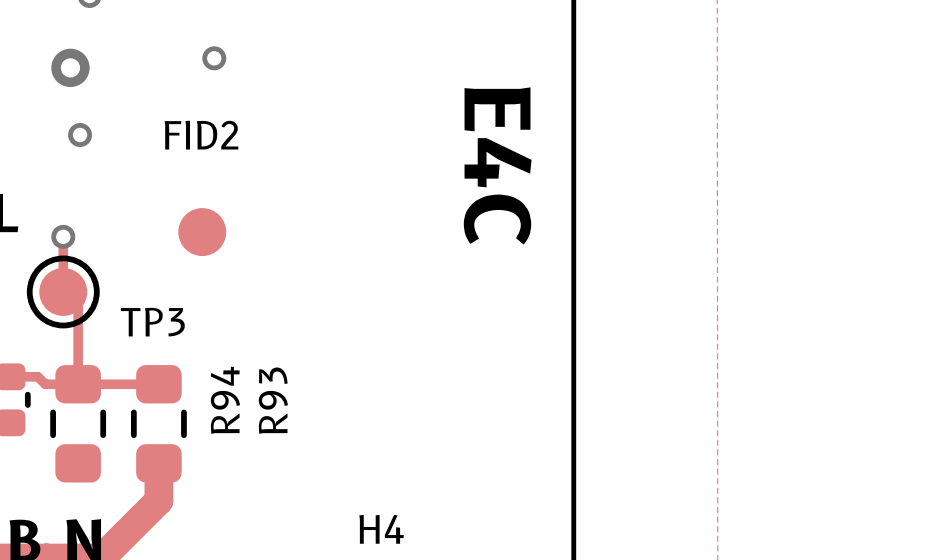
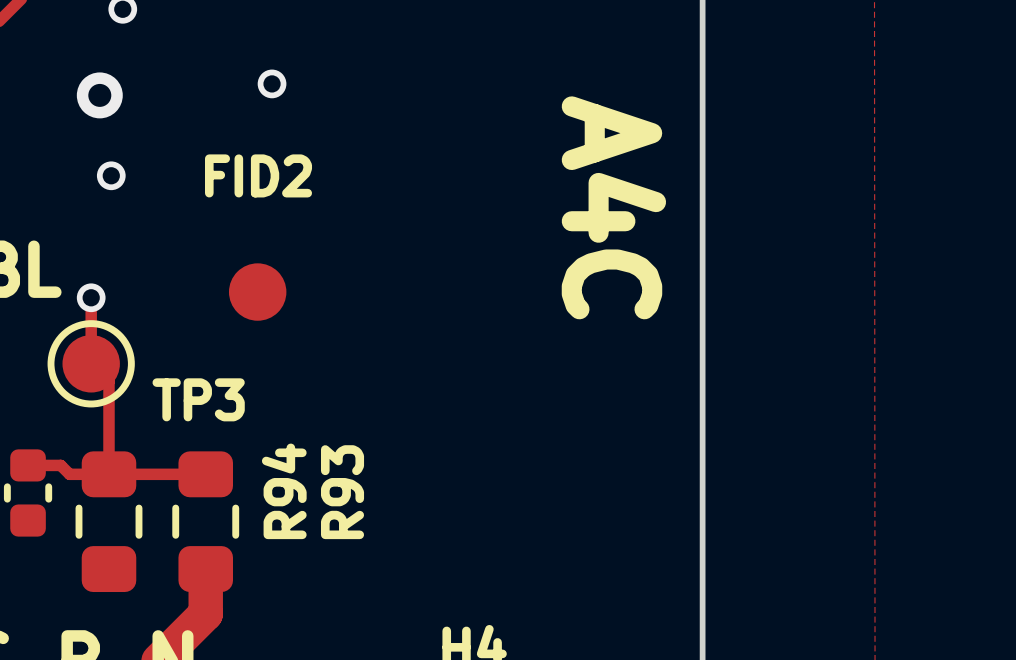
text: E4C (497, 165) -> A4C (613, 207)

